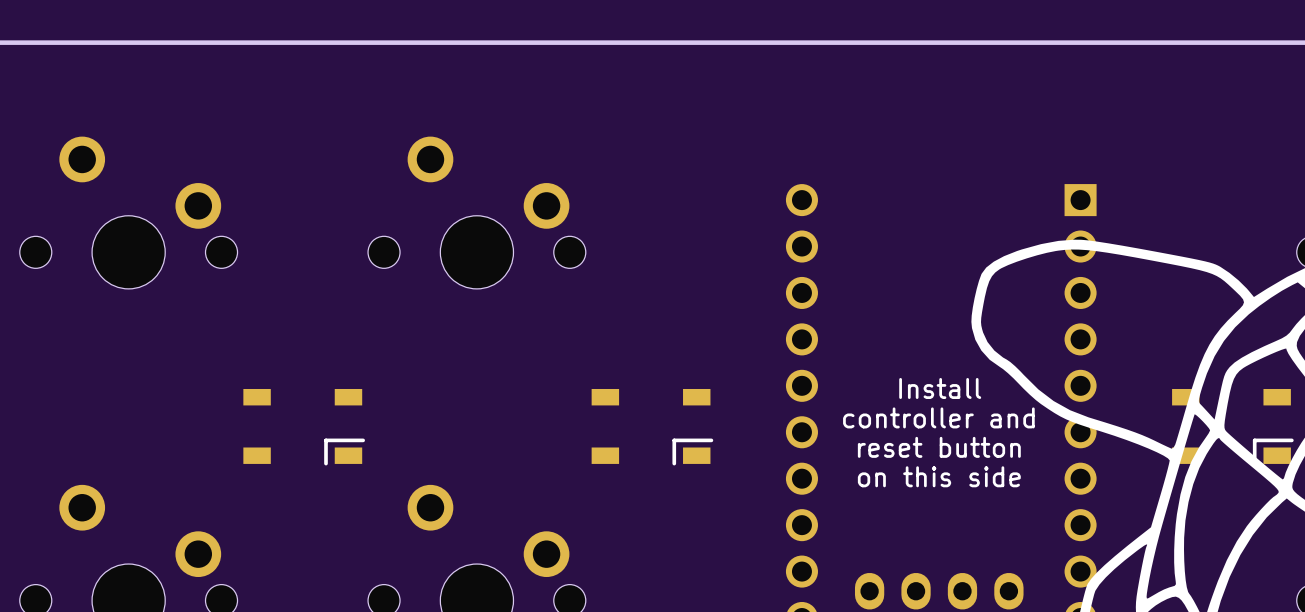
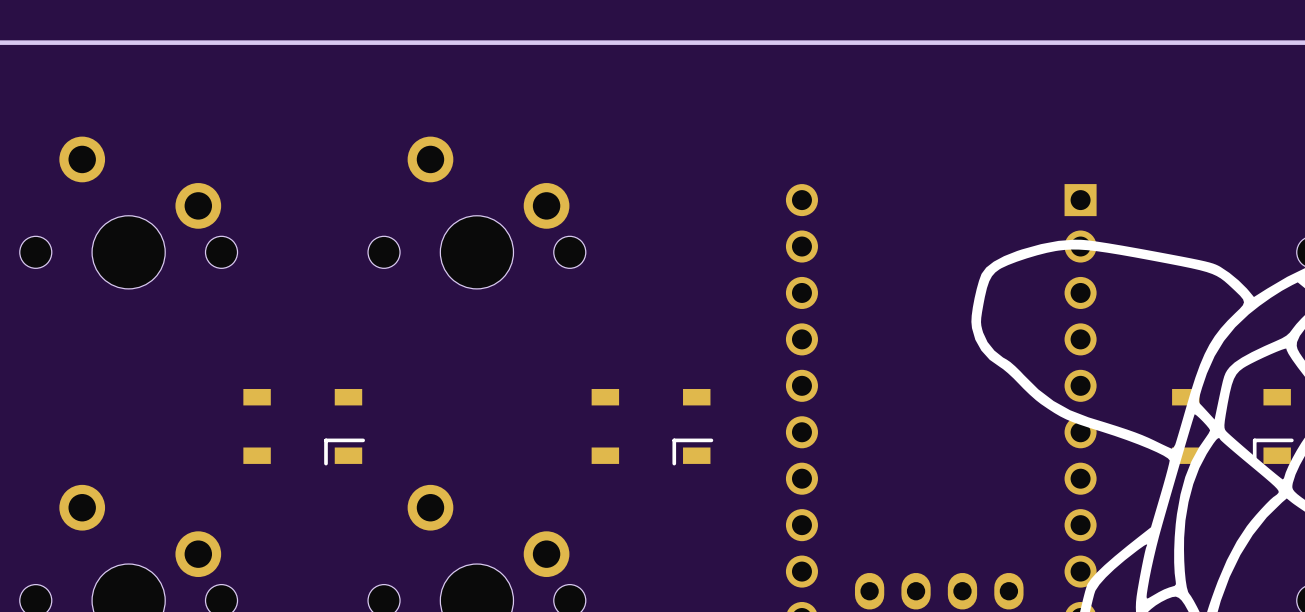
text: Install (940, 388) -> none
text: controller and (938, 417) -> none
text: reset button (939, 447) -> none
text: on this side (939, 476) -> none

